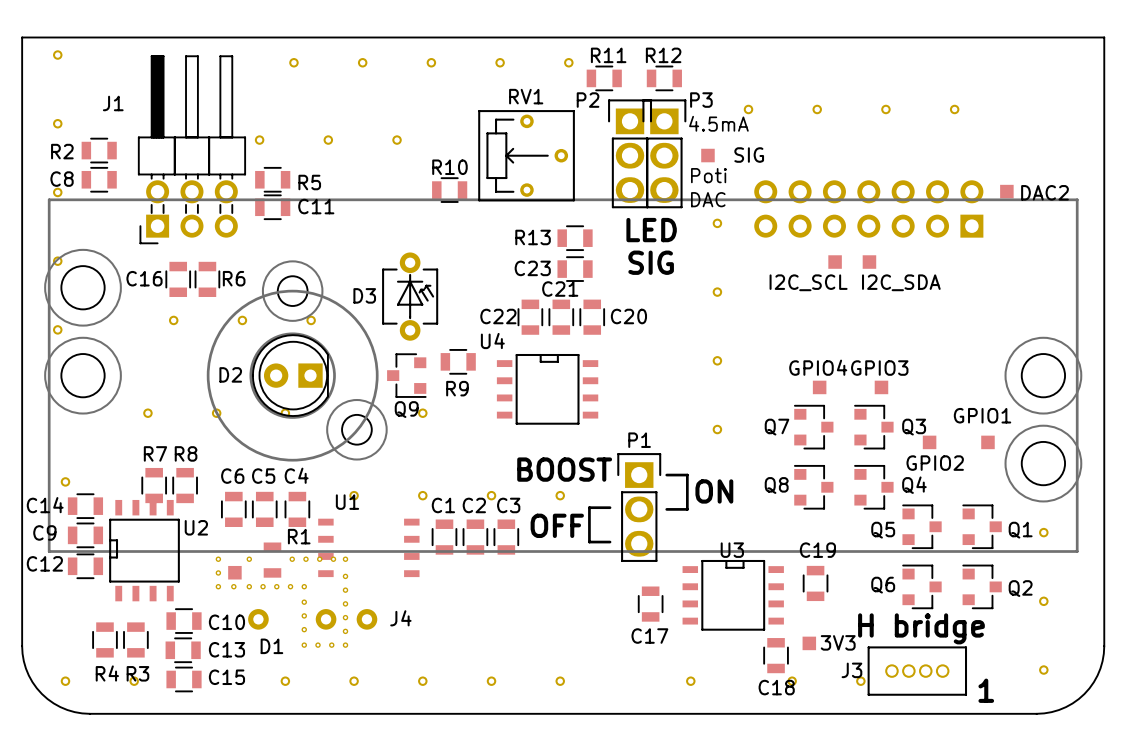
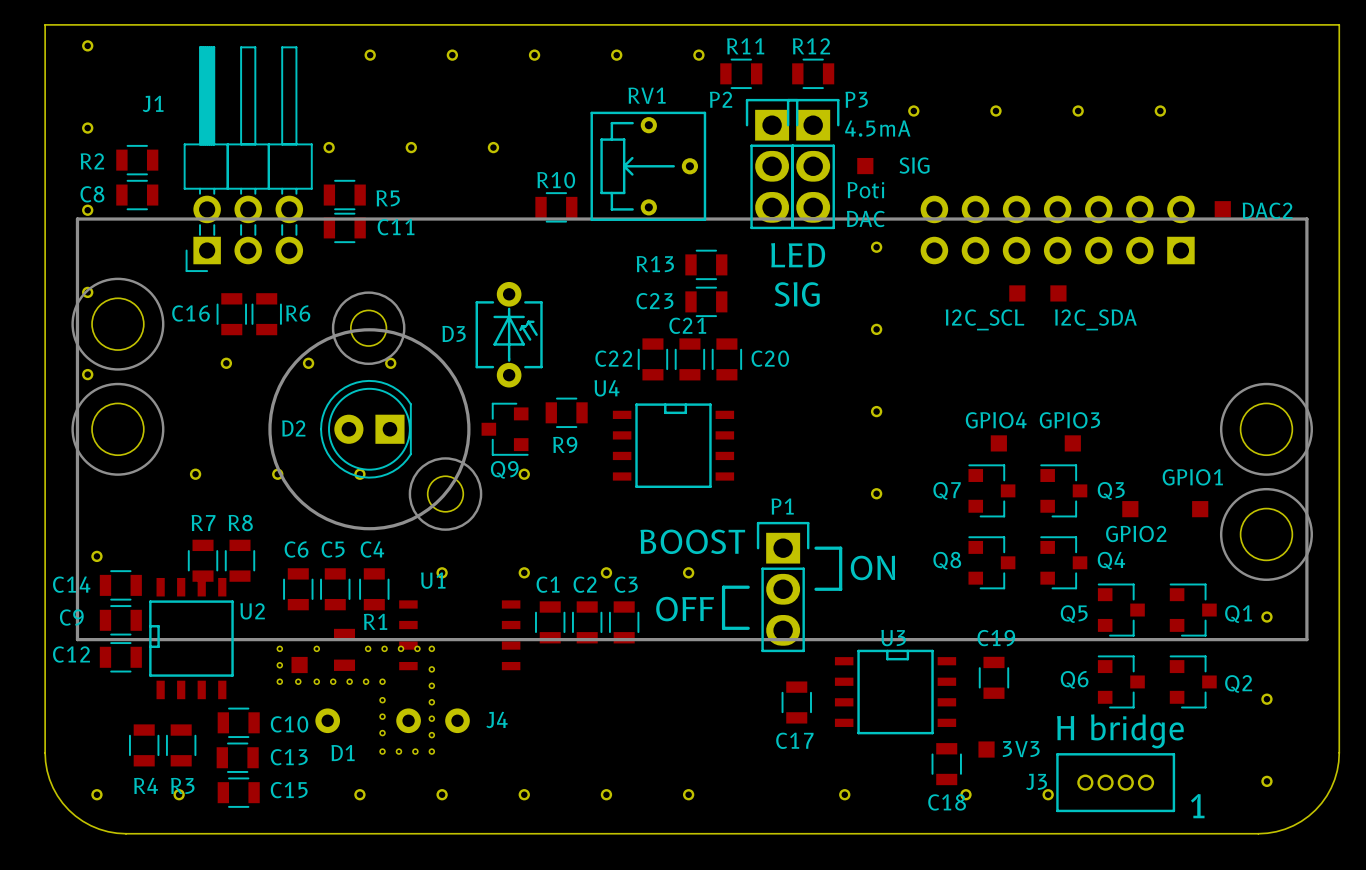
drawing: [206, 289, 379, 462] -> none
drawing: none -> [268, 328, 471, 531]

